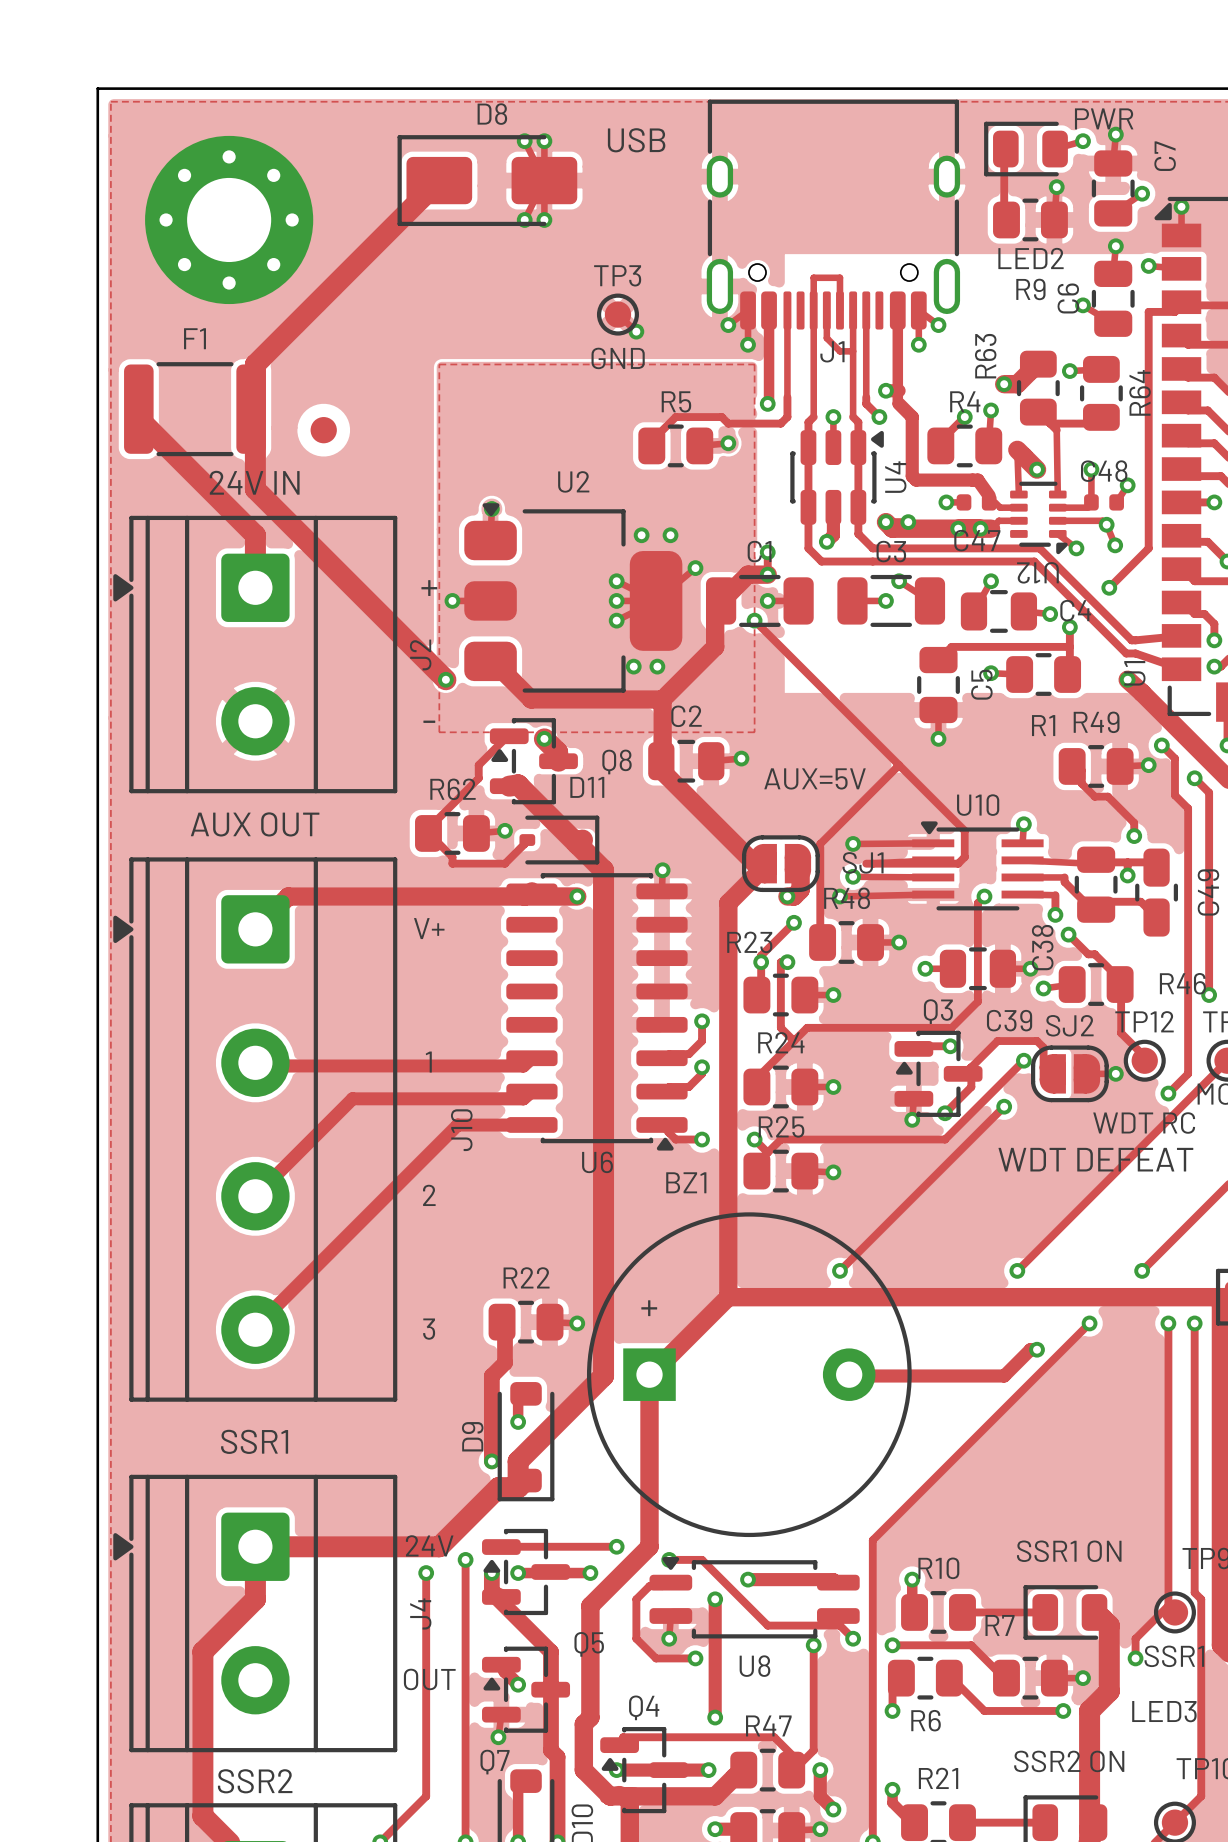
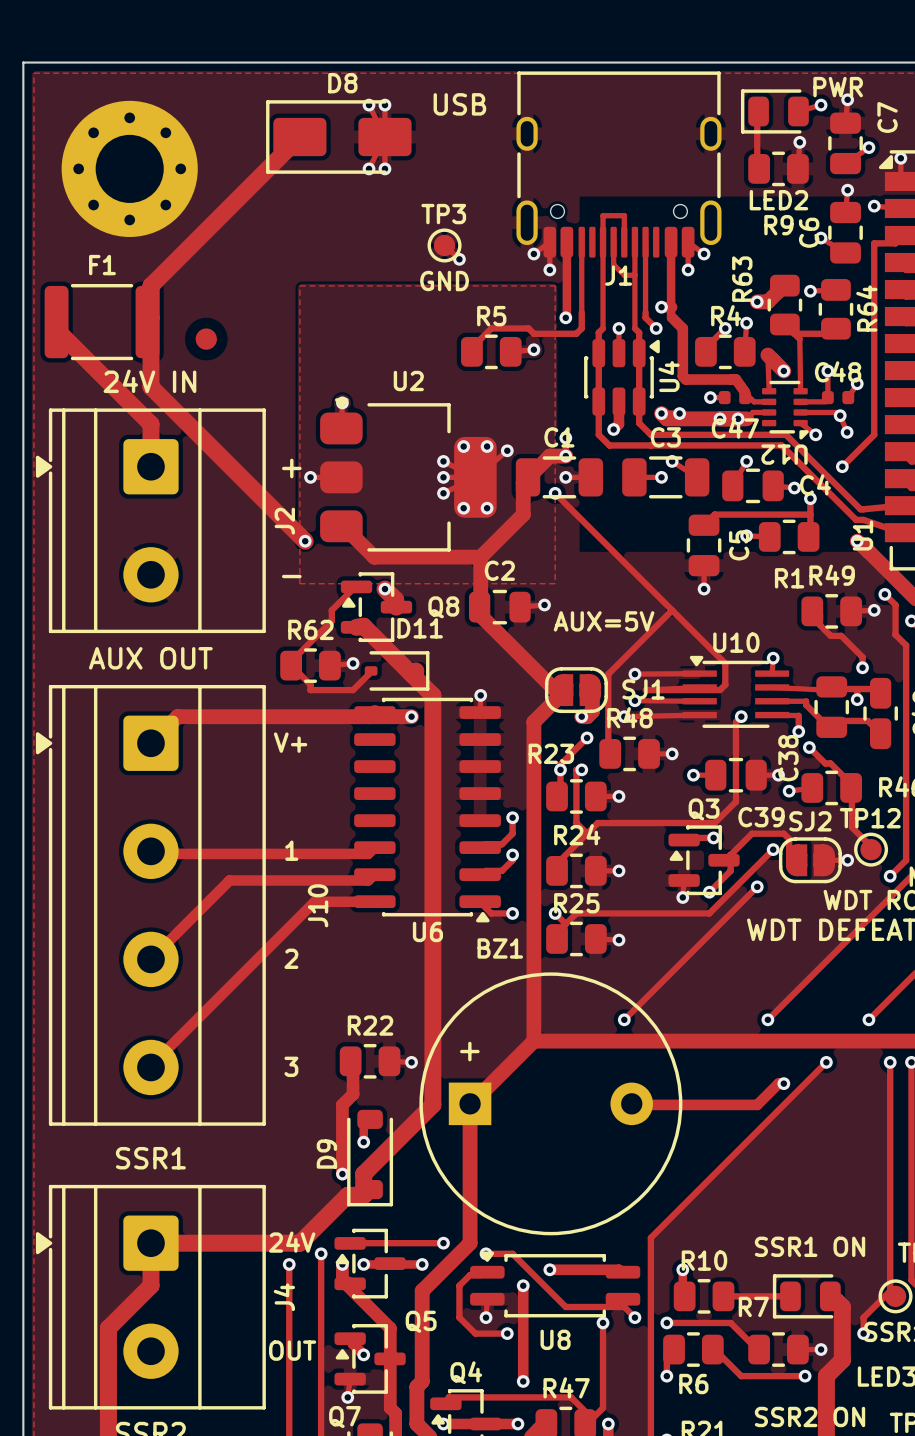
via: (641, 535) -> none
via: (670, 535) -> none
via: none -> (463, 446)
via: none -> (487, 446)
via: none -> (463, 508)
via: none -> (487, 508)
via: (633, 666) -> none
via: (657, 666) -> none

